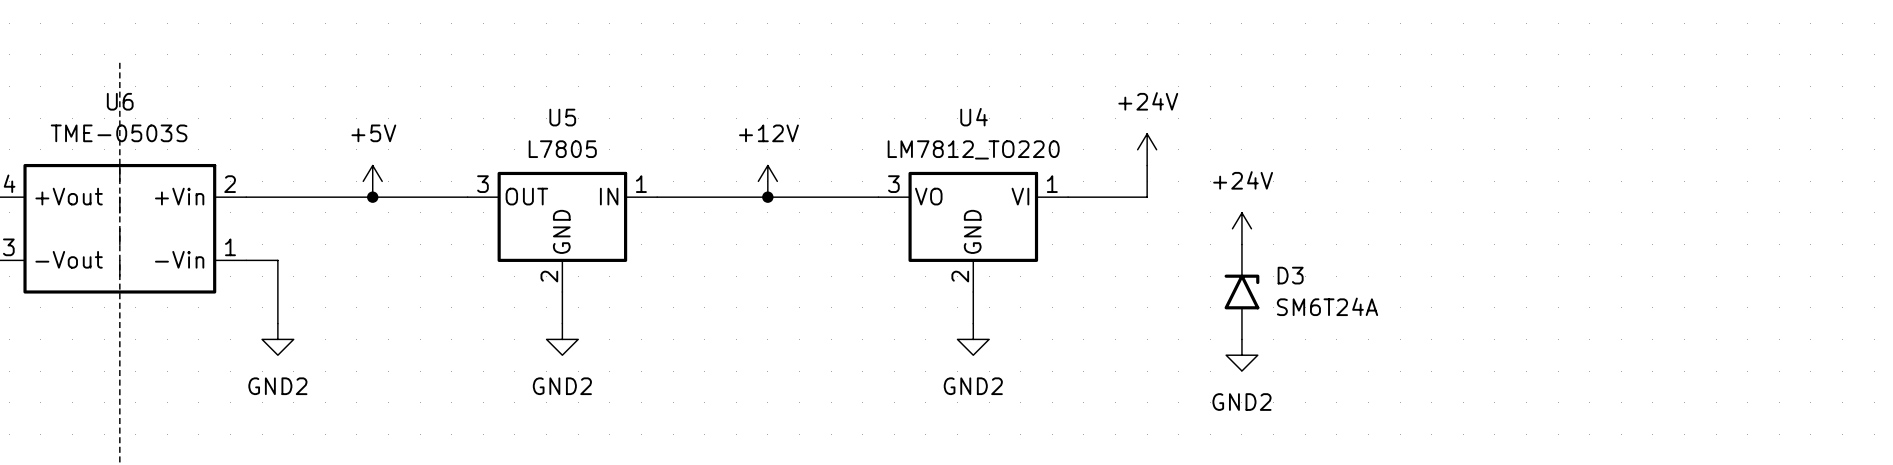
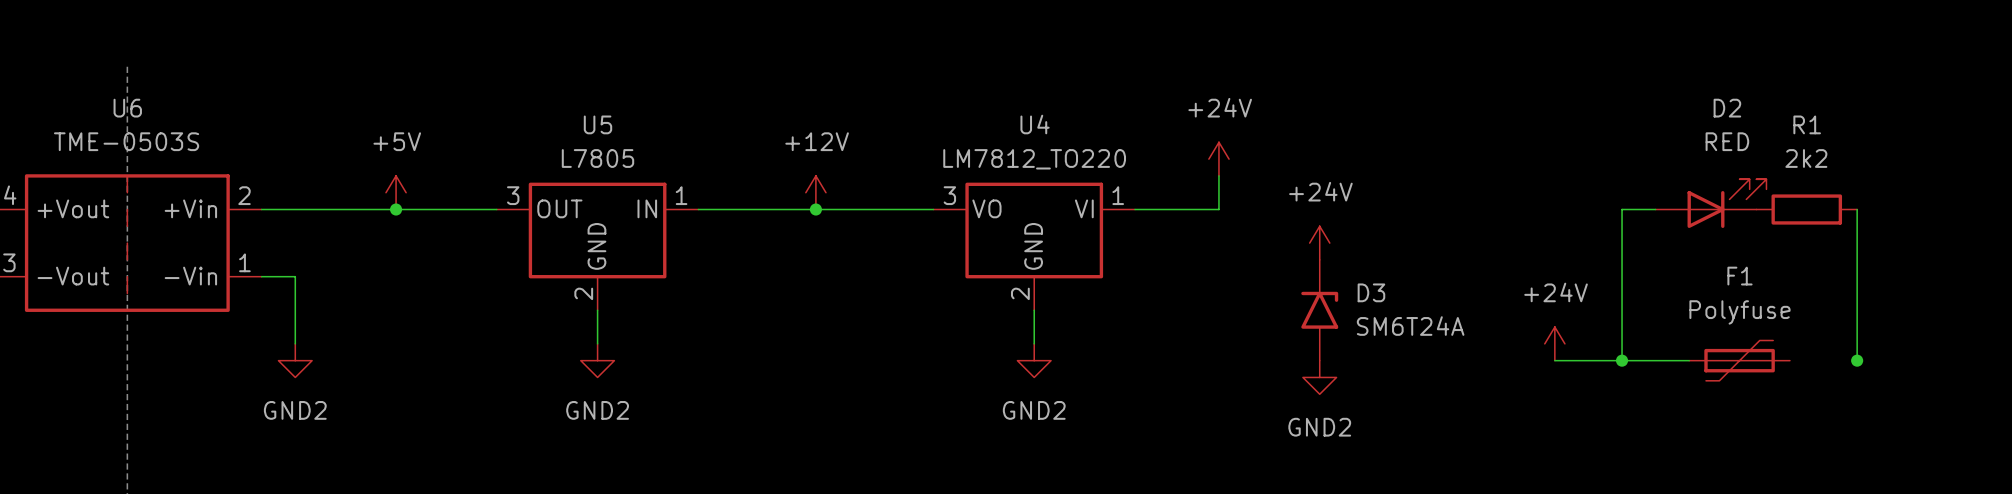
D2: none -> RED (1711, 203)
wire: none -> (1655, 209) (1622, 209) (1622, 360)
R1: none -> 2k2 (1806, 209)
wire: none -> (1857, 209) (1857, 360)
power symbol: none -> +24V (1554, 343)
wire: none -> (1554, 360) (1689, 360)
junction: none -> (1622, 360)
F1: none -> Polyfuse (1739, 360)
junction: none -> (1857, 360)

